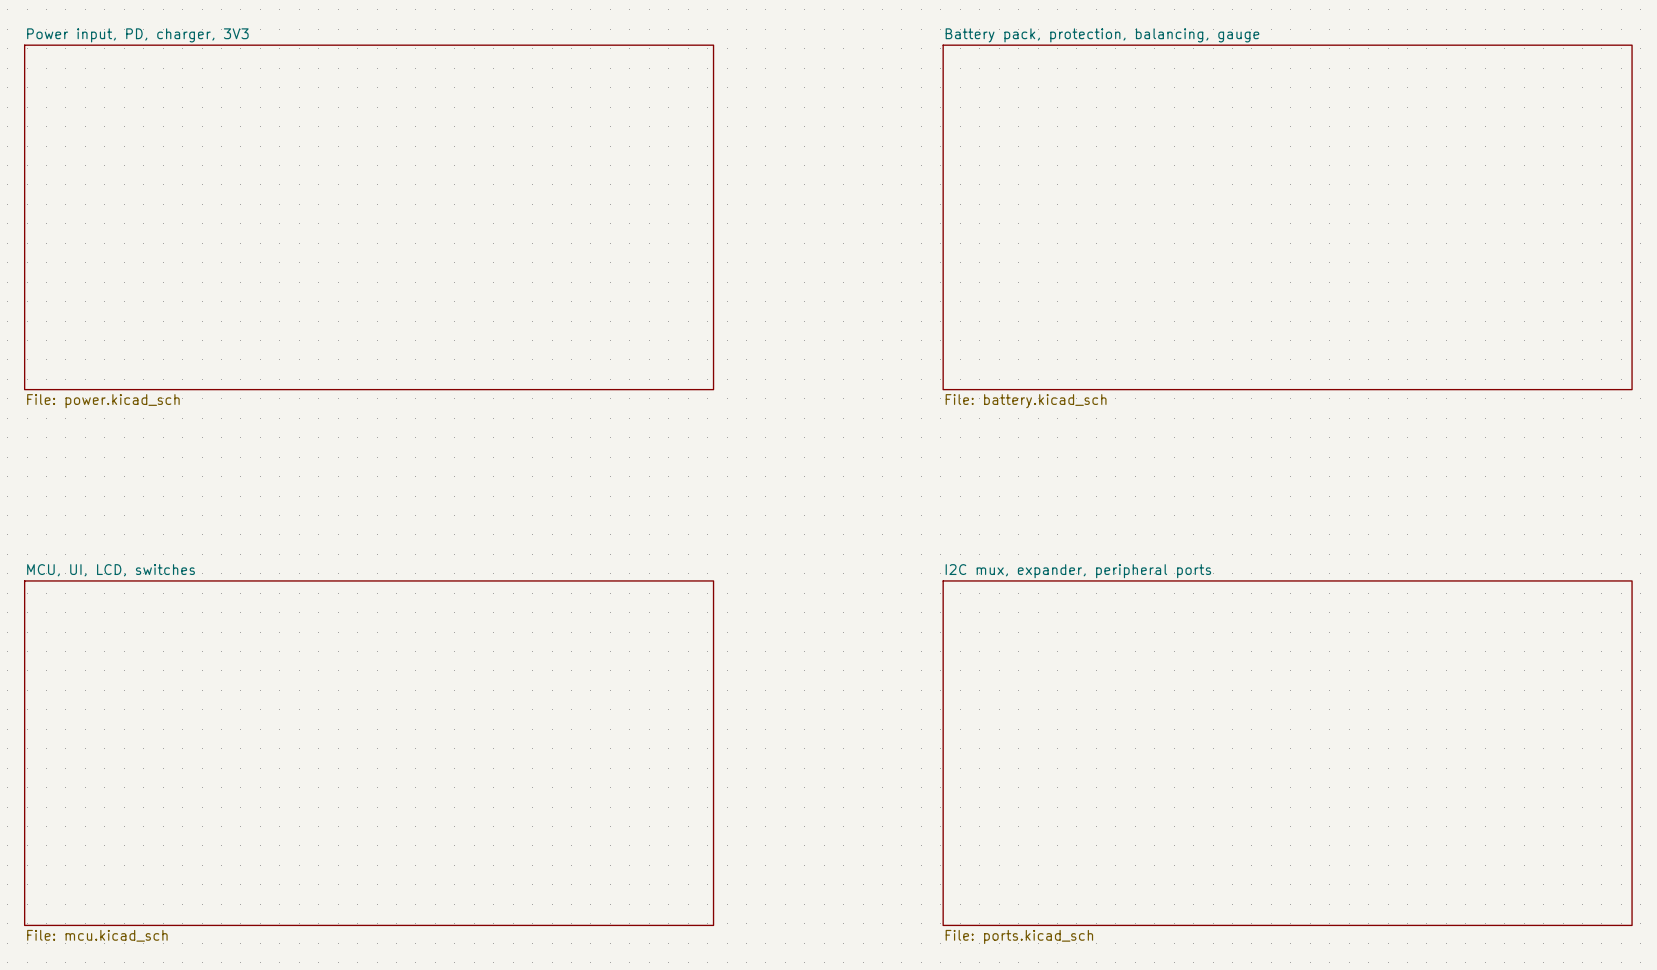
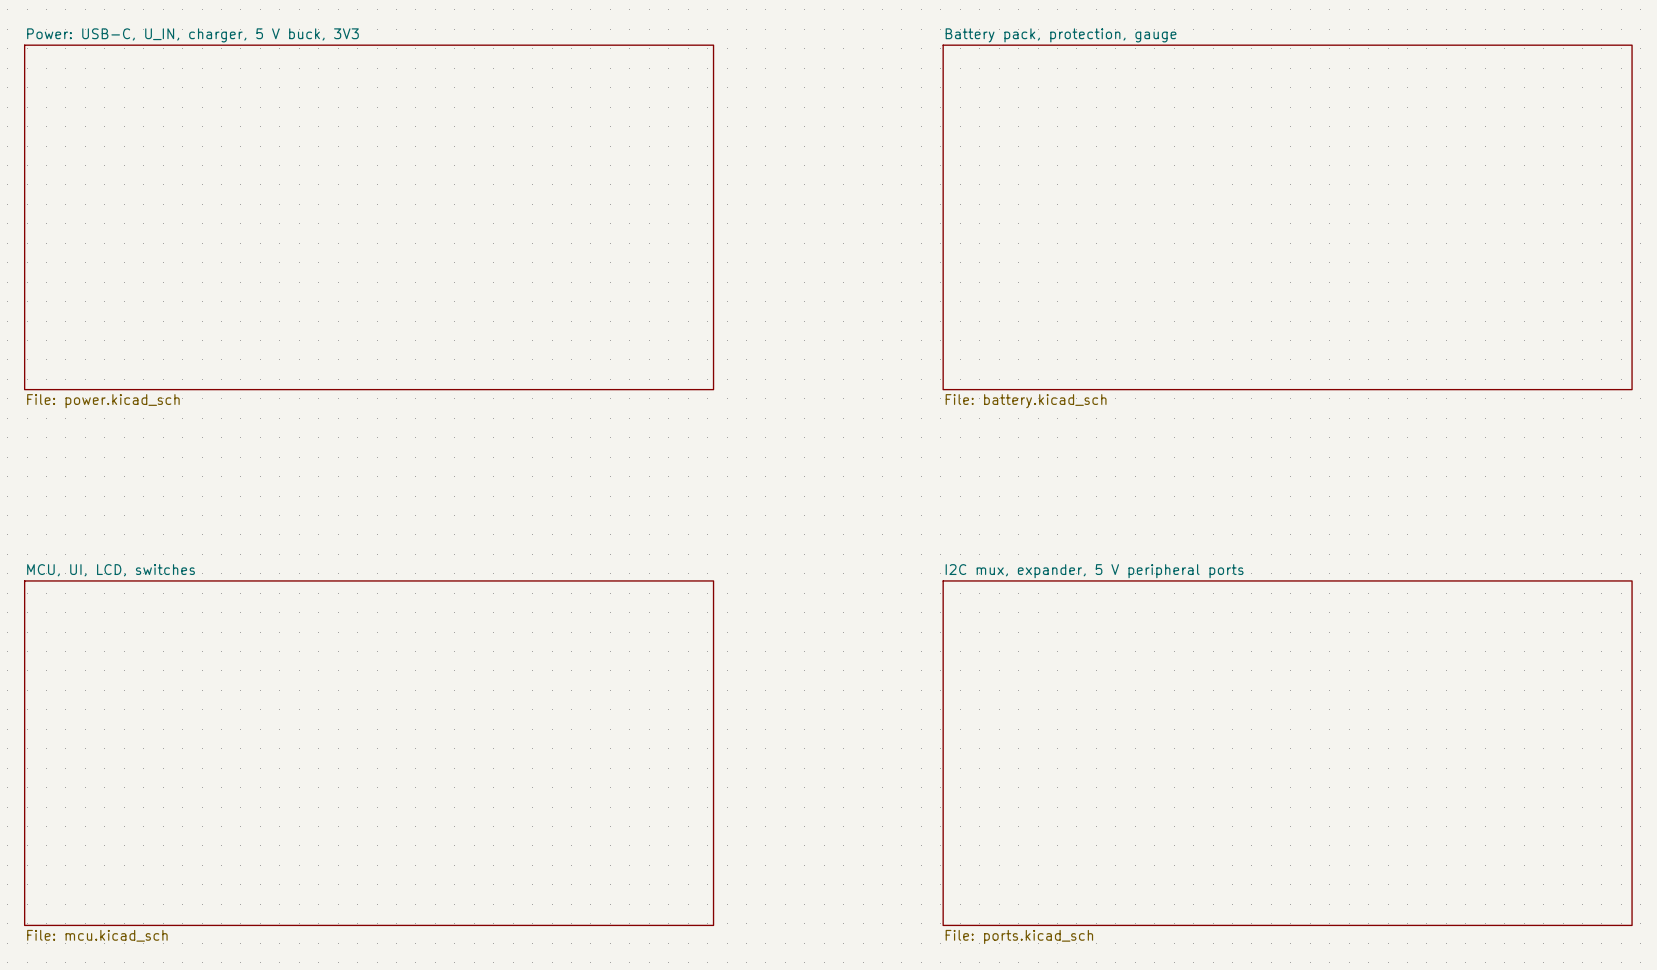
sheet Power input, PD, charger, 3V3 name: Power input, PD, charger, 3V3 (137, 35) -> Power: USB-C, U_IN, charger, 5 V buck, 3V3 (192, 35)
sheet Battery pack, protection, balancing, gauge name: Battery pack, protection, balancing, gauge (1102, 35) -> Battery pack, protection, gauge (1061, 35)
sheet I2C mux, expander, peripheral ports name: I2C mux, expander, peripheral ports (1078, 571) -> I2C mux, expander, 5 V peripheral ports (1094, 571)

